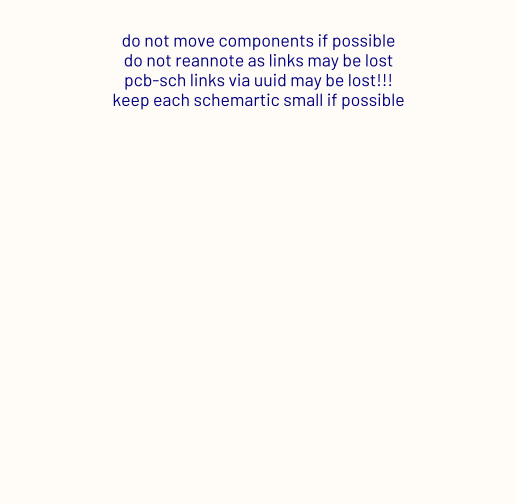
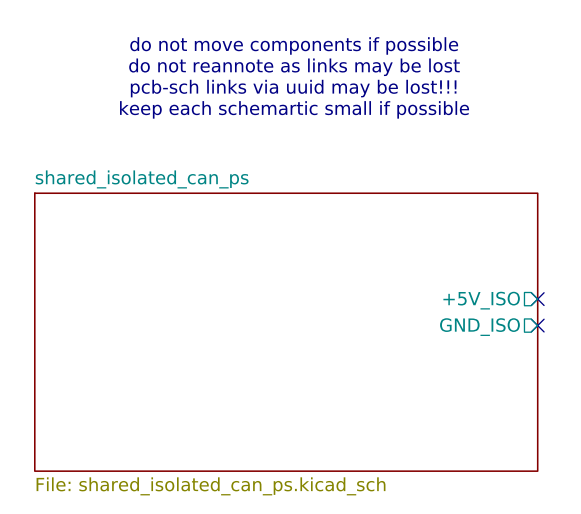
sheet pin: none -> +5V_ISO (481, 300)
no-connect mark: none -> (537, 299)
sheet pin: none -> GND_ISO (479, 327)
no-connect mark: none -> (537, 325)
sheet shared_isolated_can_ps: none -> File: shared_isolated_can_ps.kicad_sch (286, 332)

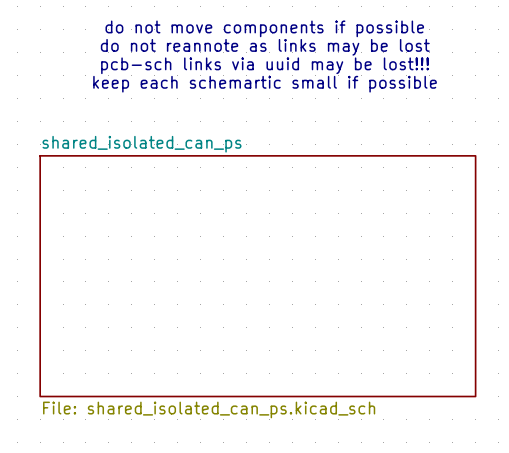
no-connect mark: (537, 299) -> none
sheet pin: +5V_ISO (481, 300) -> none
no-connect mark: (537, 325) -> none
sheet pin: GND_ISO (479, 327) -> none

